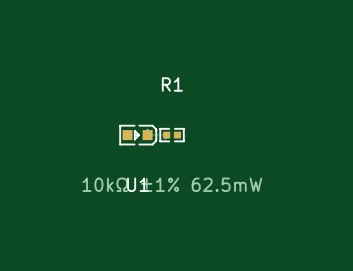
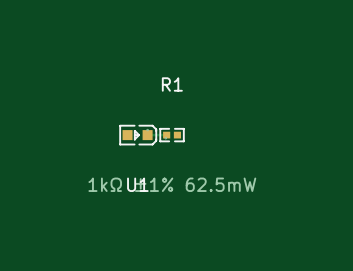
R1 value: 10kΩ ±1% 62.5mW (172, 184) -> 1kΩ ±1% 62.5mW (172, 184)

